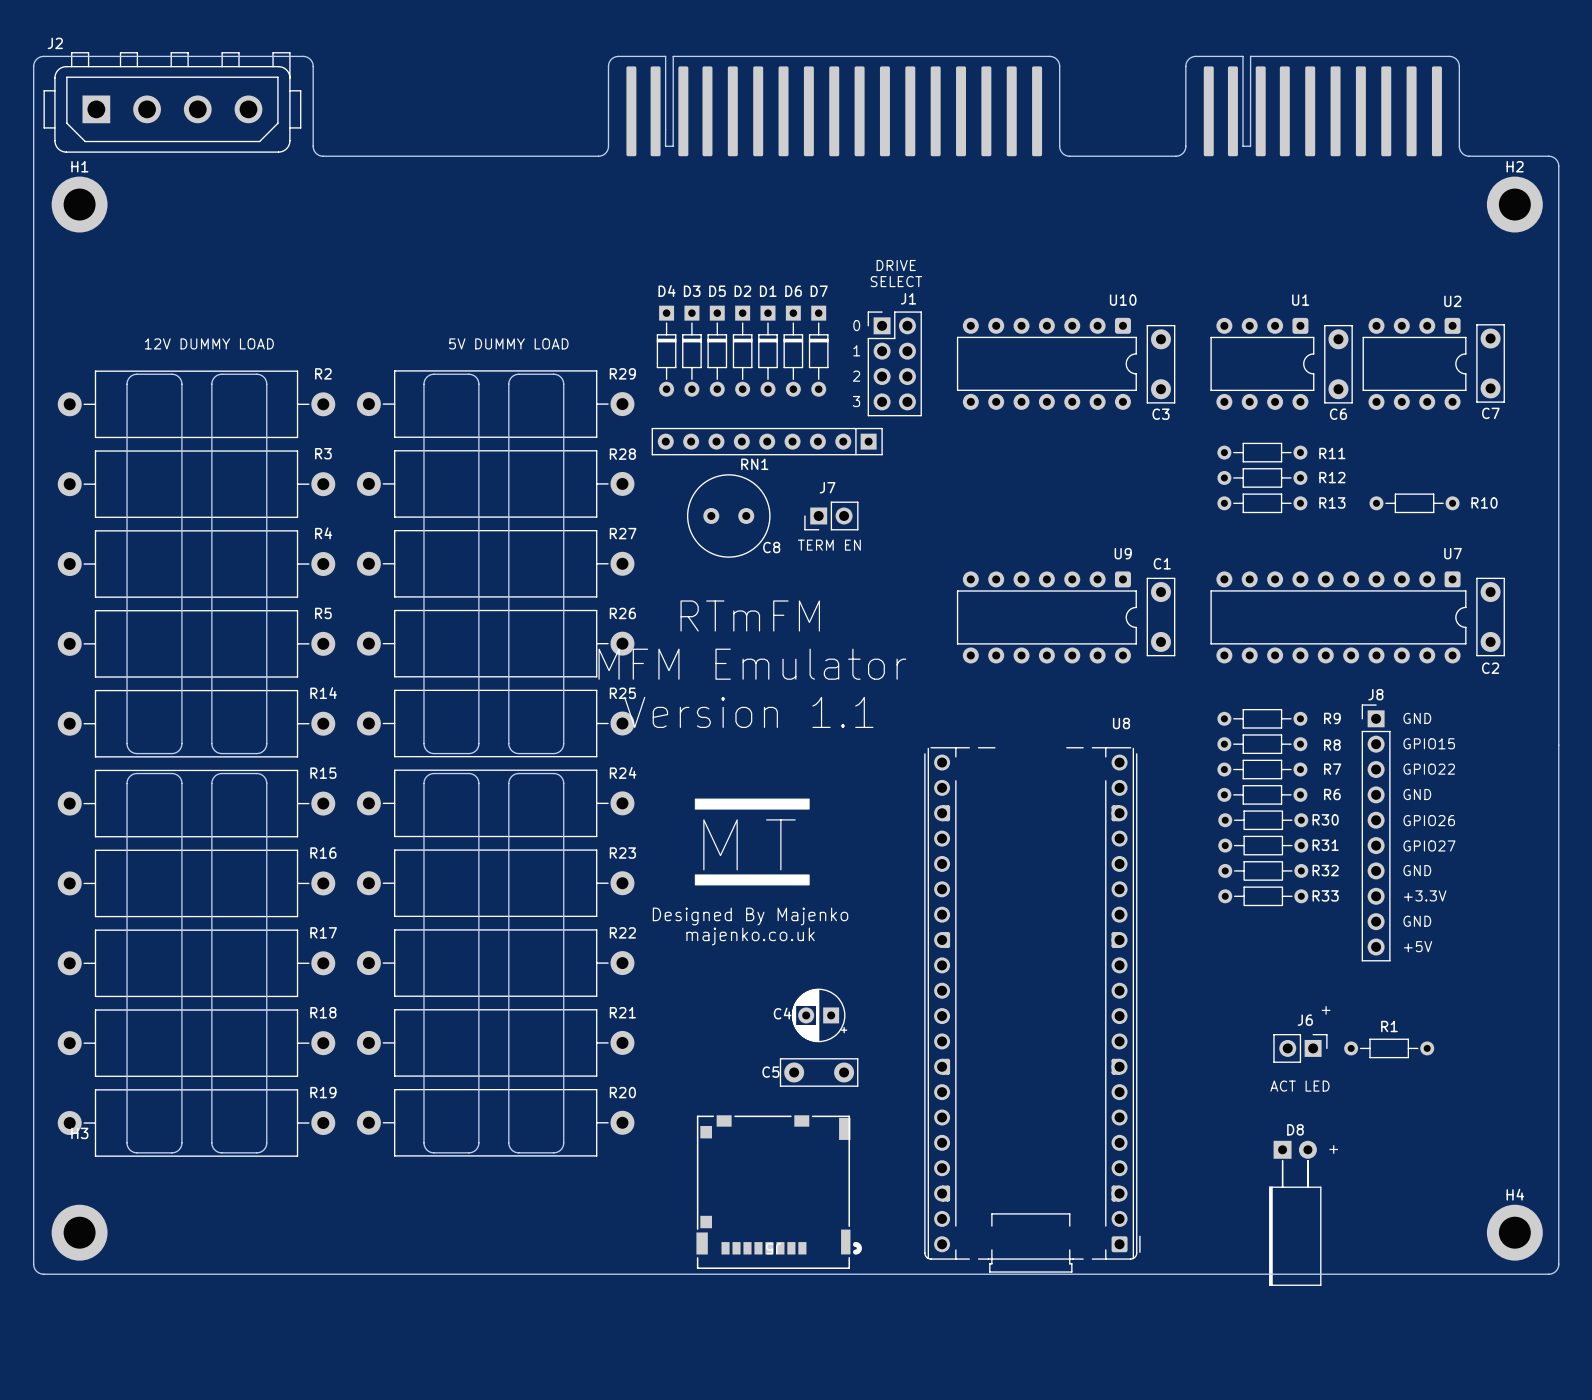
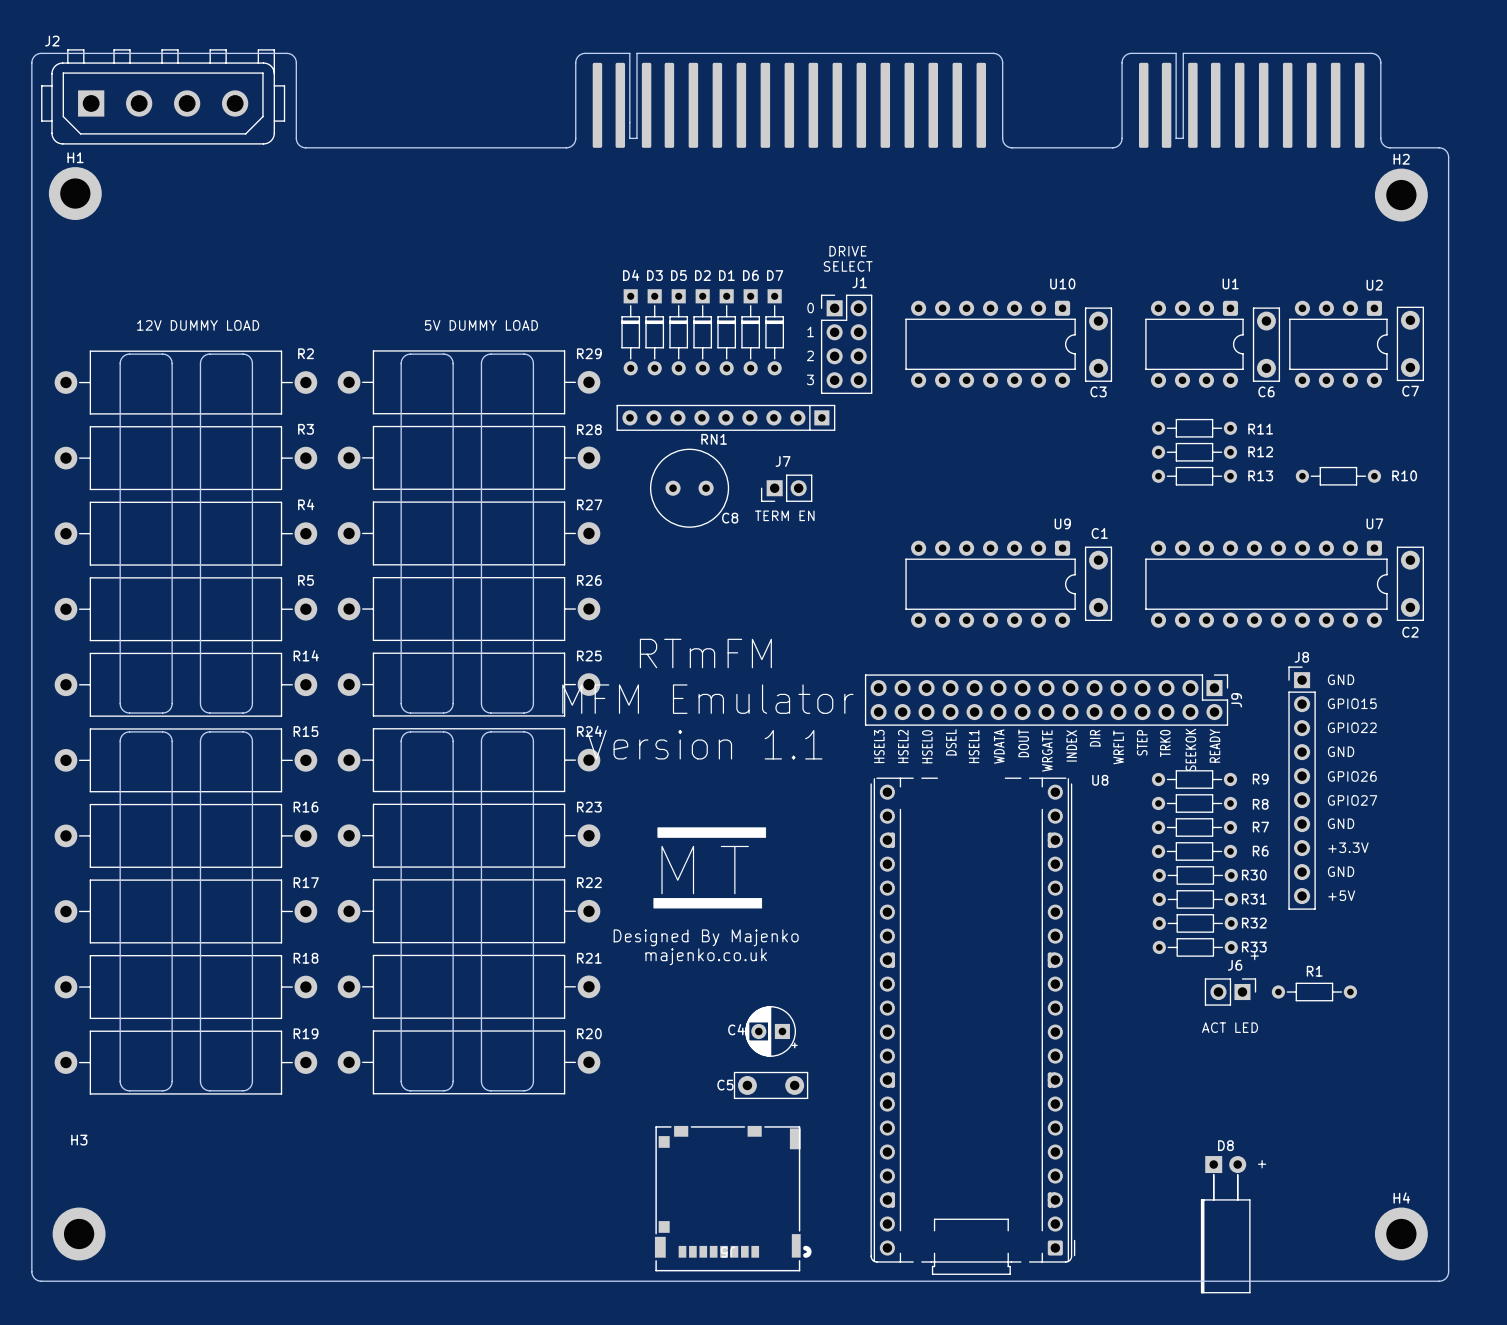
board edge: (1521, 156) (1551, 156) (1556, 159) (1558, 166) (1558, 1264) (1555, 1272) (1548, 1274) (43, 1274) (36, 1271) (33, 1264) -> (1439, 147) (1445, 150) (1448, 157) (1448, 1271) (1445, 1279) (1439, 1281) (40, 1281) (34, 1278) (31, 1272) (31, 1196)
H2 position: (1514, 204) -> (1401, 195)
text position: RTmFM (750, 615) -> RTmFM (705, 653)
text position: MFM Emulator (752, 664) -> MFM Emulator (707, 699)
text position: Version 1.1 (748, 712) -> Version 1.1 (704, 744)
R9 position: (1262, 718) -> (1194, 779)
U8 name position: U8 (1121, 723) -> U8 (1100, 780)
J9: none -> (1046, 700)
R8 position: (1262, 744) -> (1194, 803)
R7 position: (1262, 769) -> (1194, 827)
text: none -> DIR (1095, 738)
text: none -> DSEL (951, 742)
text: none -> STEP (1142, 742)
text: none -> DOUT (1023, 743)
text: none -> TRK0 (1165, 743)
text: none -> HSEL3 (879, 746)
text: none -> HSEL2 (903, 746)
text: none -> HSEL1 (974, 746)
text: none -> INDEX (1071, 745)
text: none -> READY (1214, 745)
text: none -> HSEL0 (927, 746)
text: none -> WDATA (999, 746)
text: none -> WRFLT (1118, 747)
text: none -> SEEKOK (1190, 749)
text: none -> WRGATE (1047, 750)
R6 position: (1262, 794) -> (1194, 851)
drawing position: (752, 804) -> (707, 903)
R30 position: (1263, 820) -> (1195, 875)
text position: M (720, 844) -> M (677, 870)
text position: T (780, 844) -> T (734, 870)
R31 position: (1263, 845) -> (1195, 899)
R32 position: (1263, 870) -> (1195, 923)
R33 position: (1263, 896) -> (1195, 947)
text position: Designed By Majenko (750, 916) -> Designed By Majenko (706, 937)
text position: majenko.co.uk (750, 936) -> majenko.co.uk (706, 956)
U8 position: (1032, 1009) -> (972, 1026)
C4 position: (819, 1015) -> (771, 1031)
C5 position: (819, 1072) -> (771, 1085)
text position: + (1333, 1149) -> + (1262, 1164)
part position: (779, 1192) -> (733, 1198)
D8 position: (1295, 1213) -> (1225, 1224)
H3 position: (79, 1232) -> (79, 1233)
H4 position: (1514, 1232) -> (1401, 1233)

